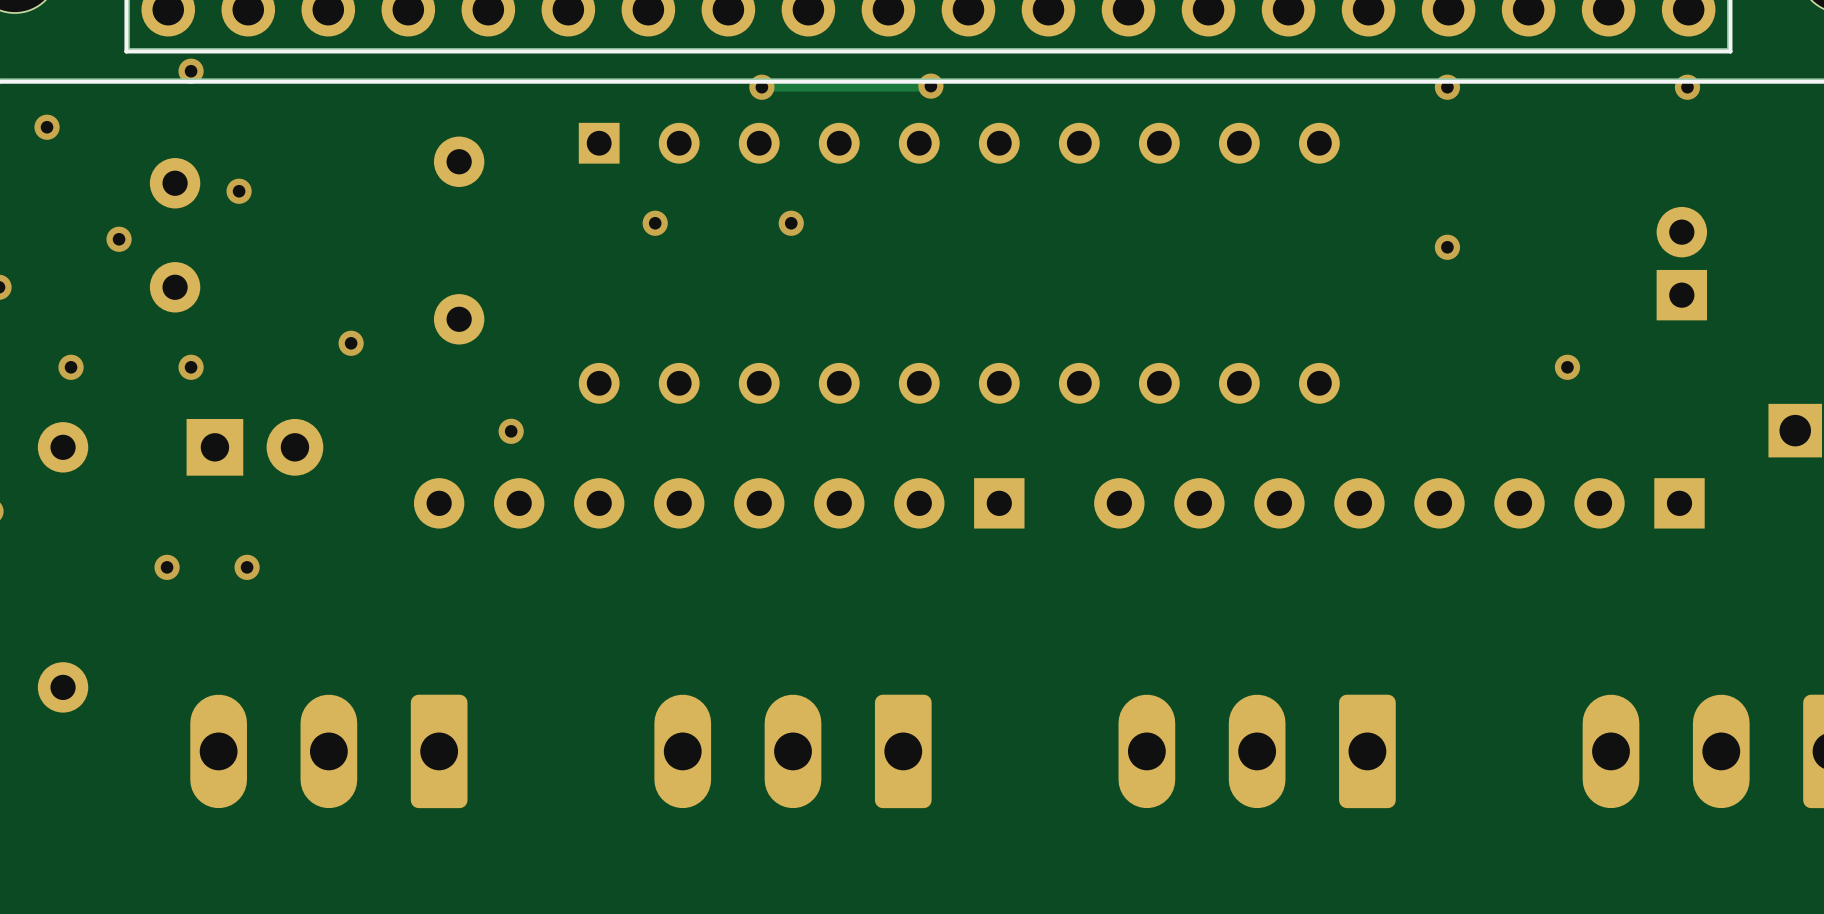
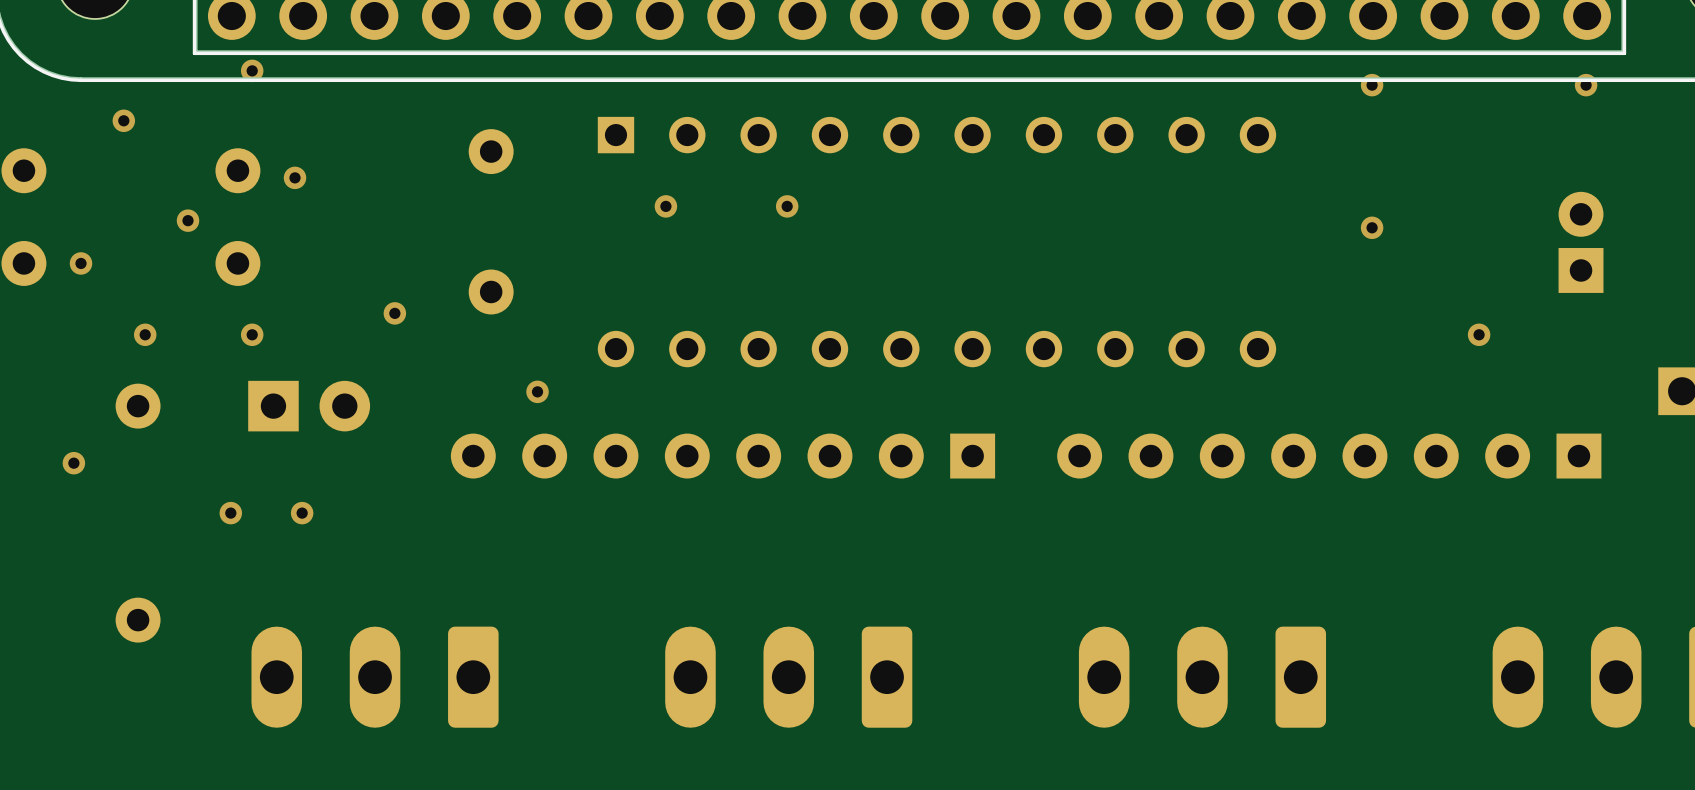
track: (930, 86) (761, 87) -> none
via: (930, 86) -> none
via: (761, 87) -> none

